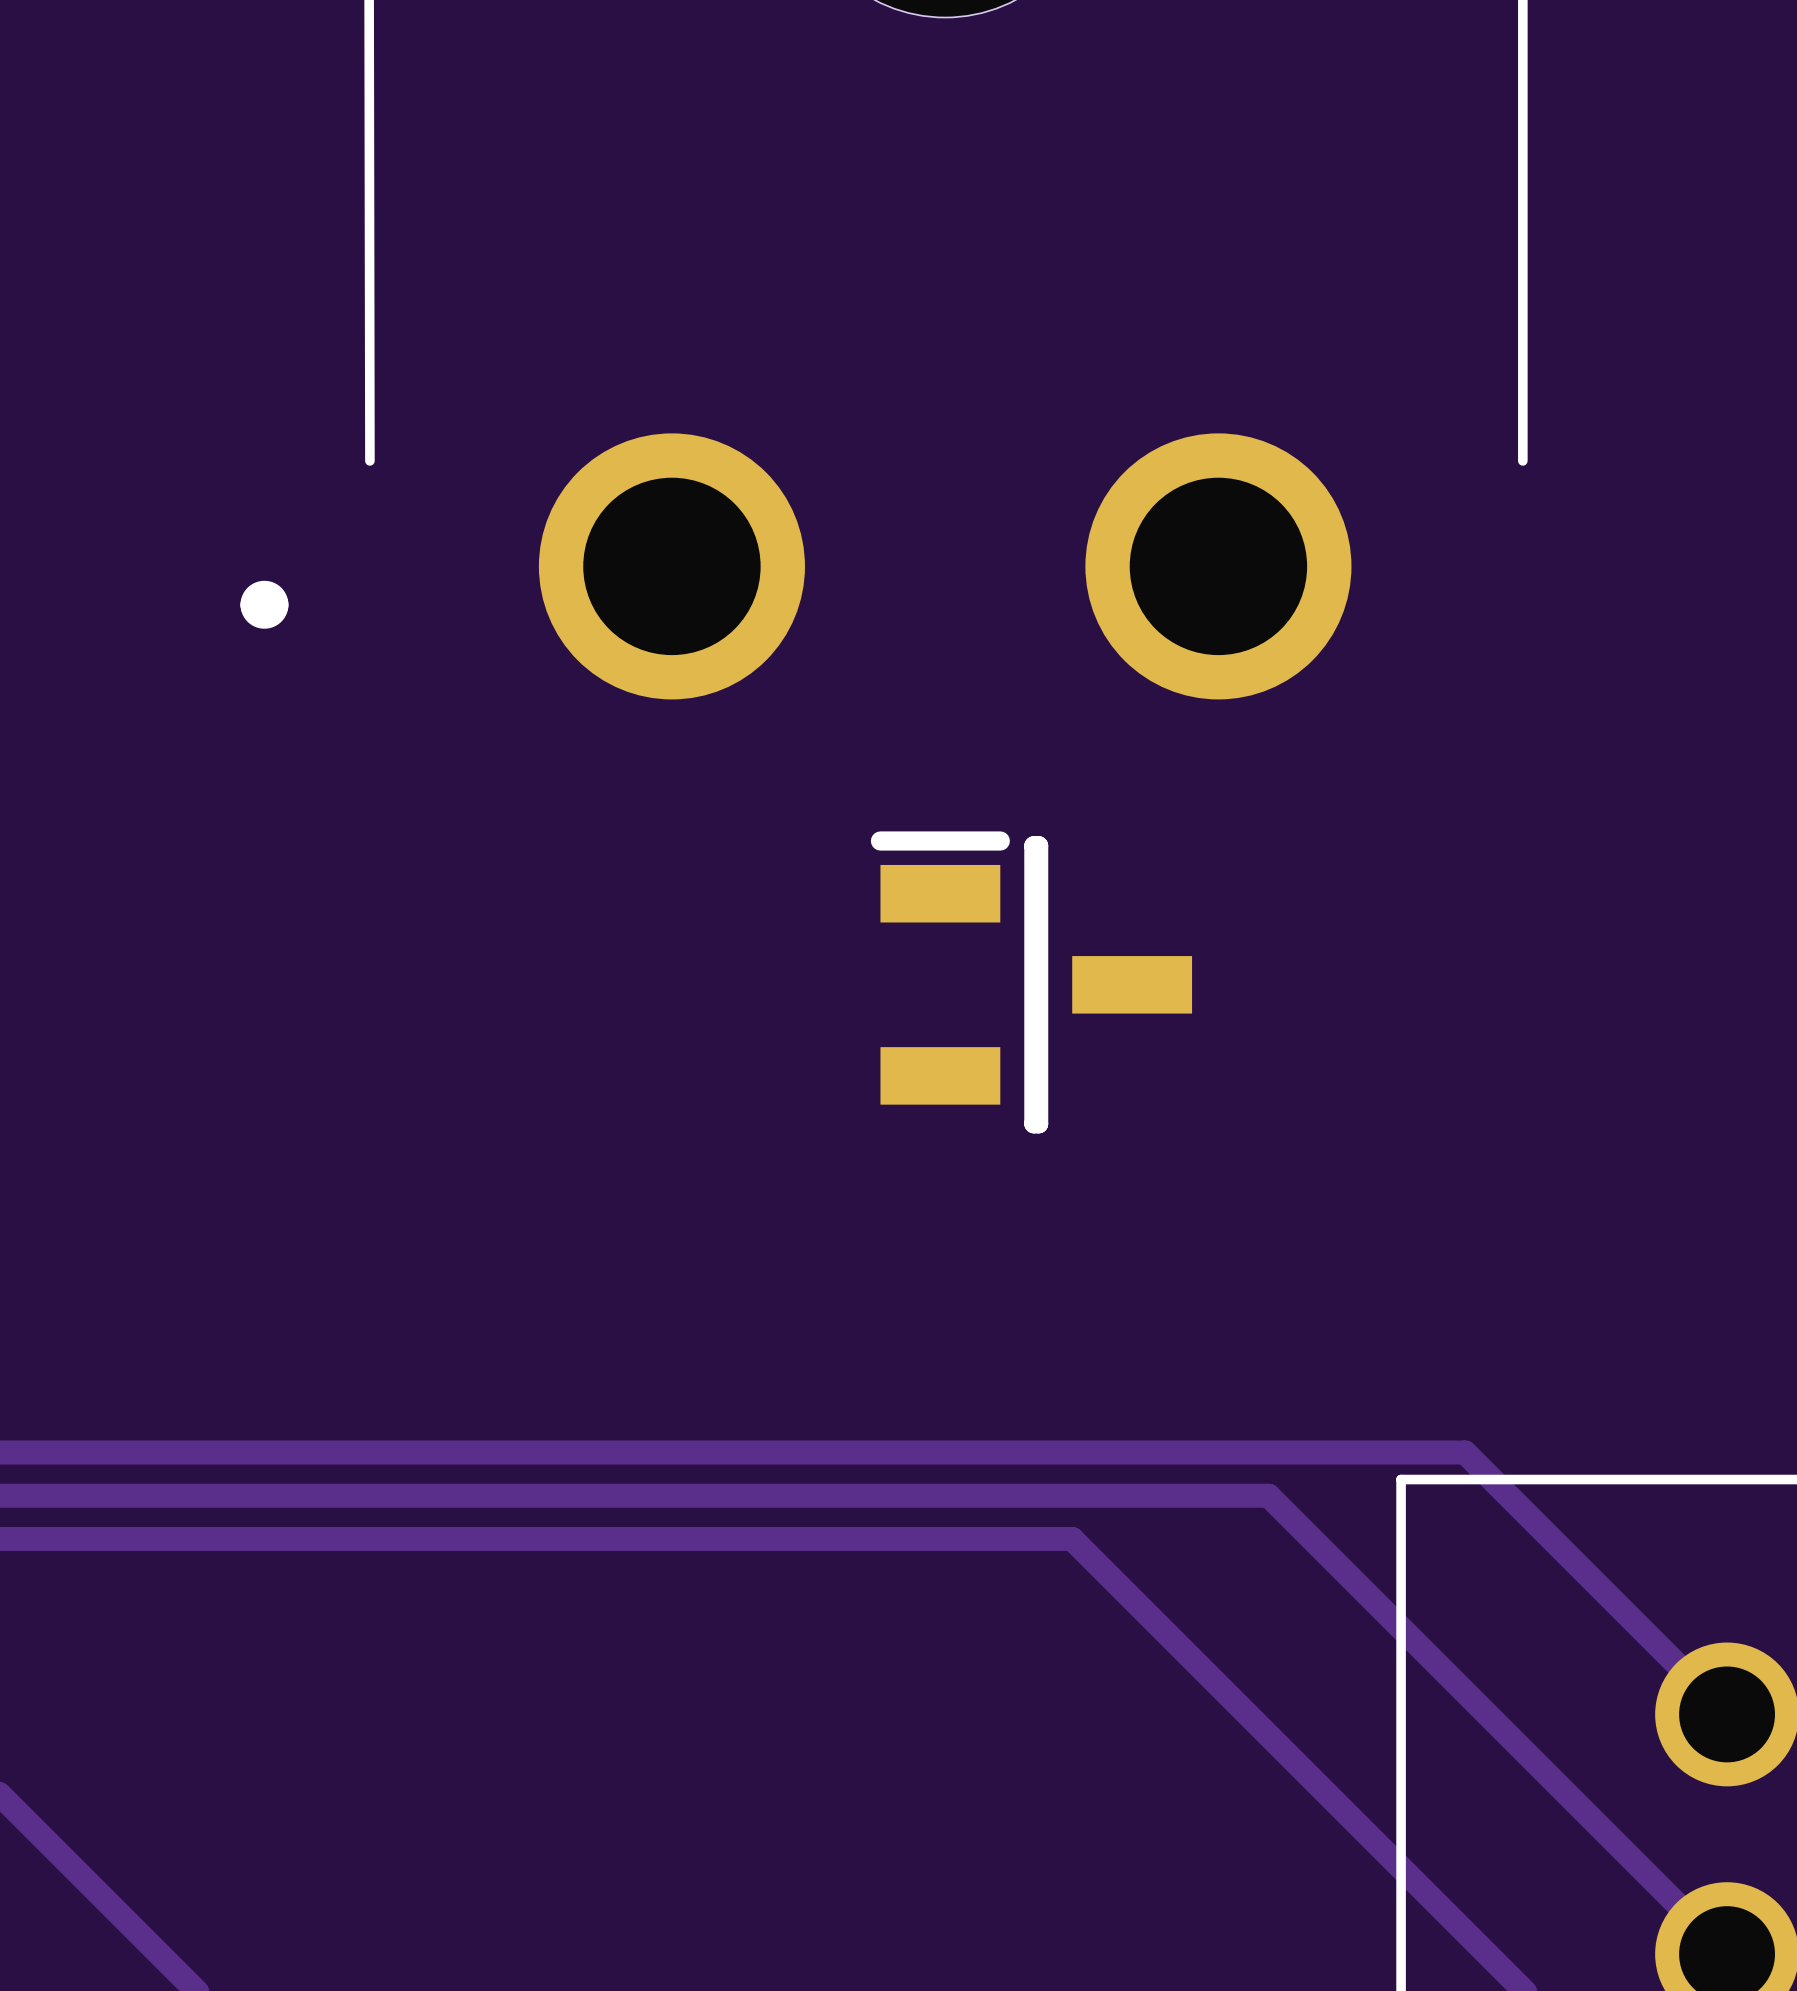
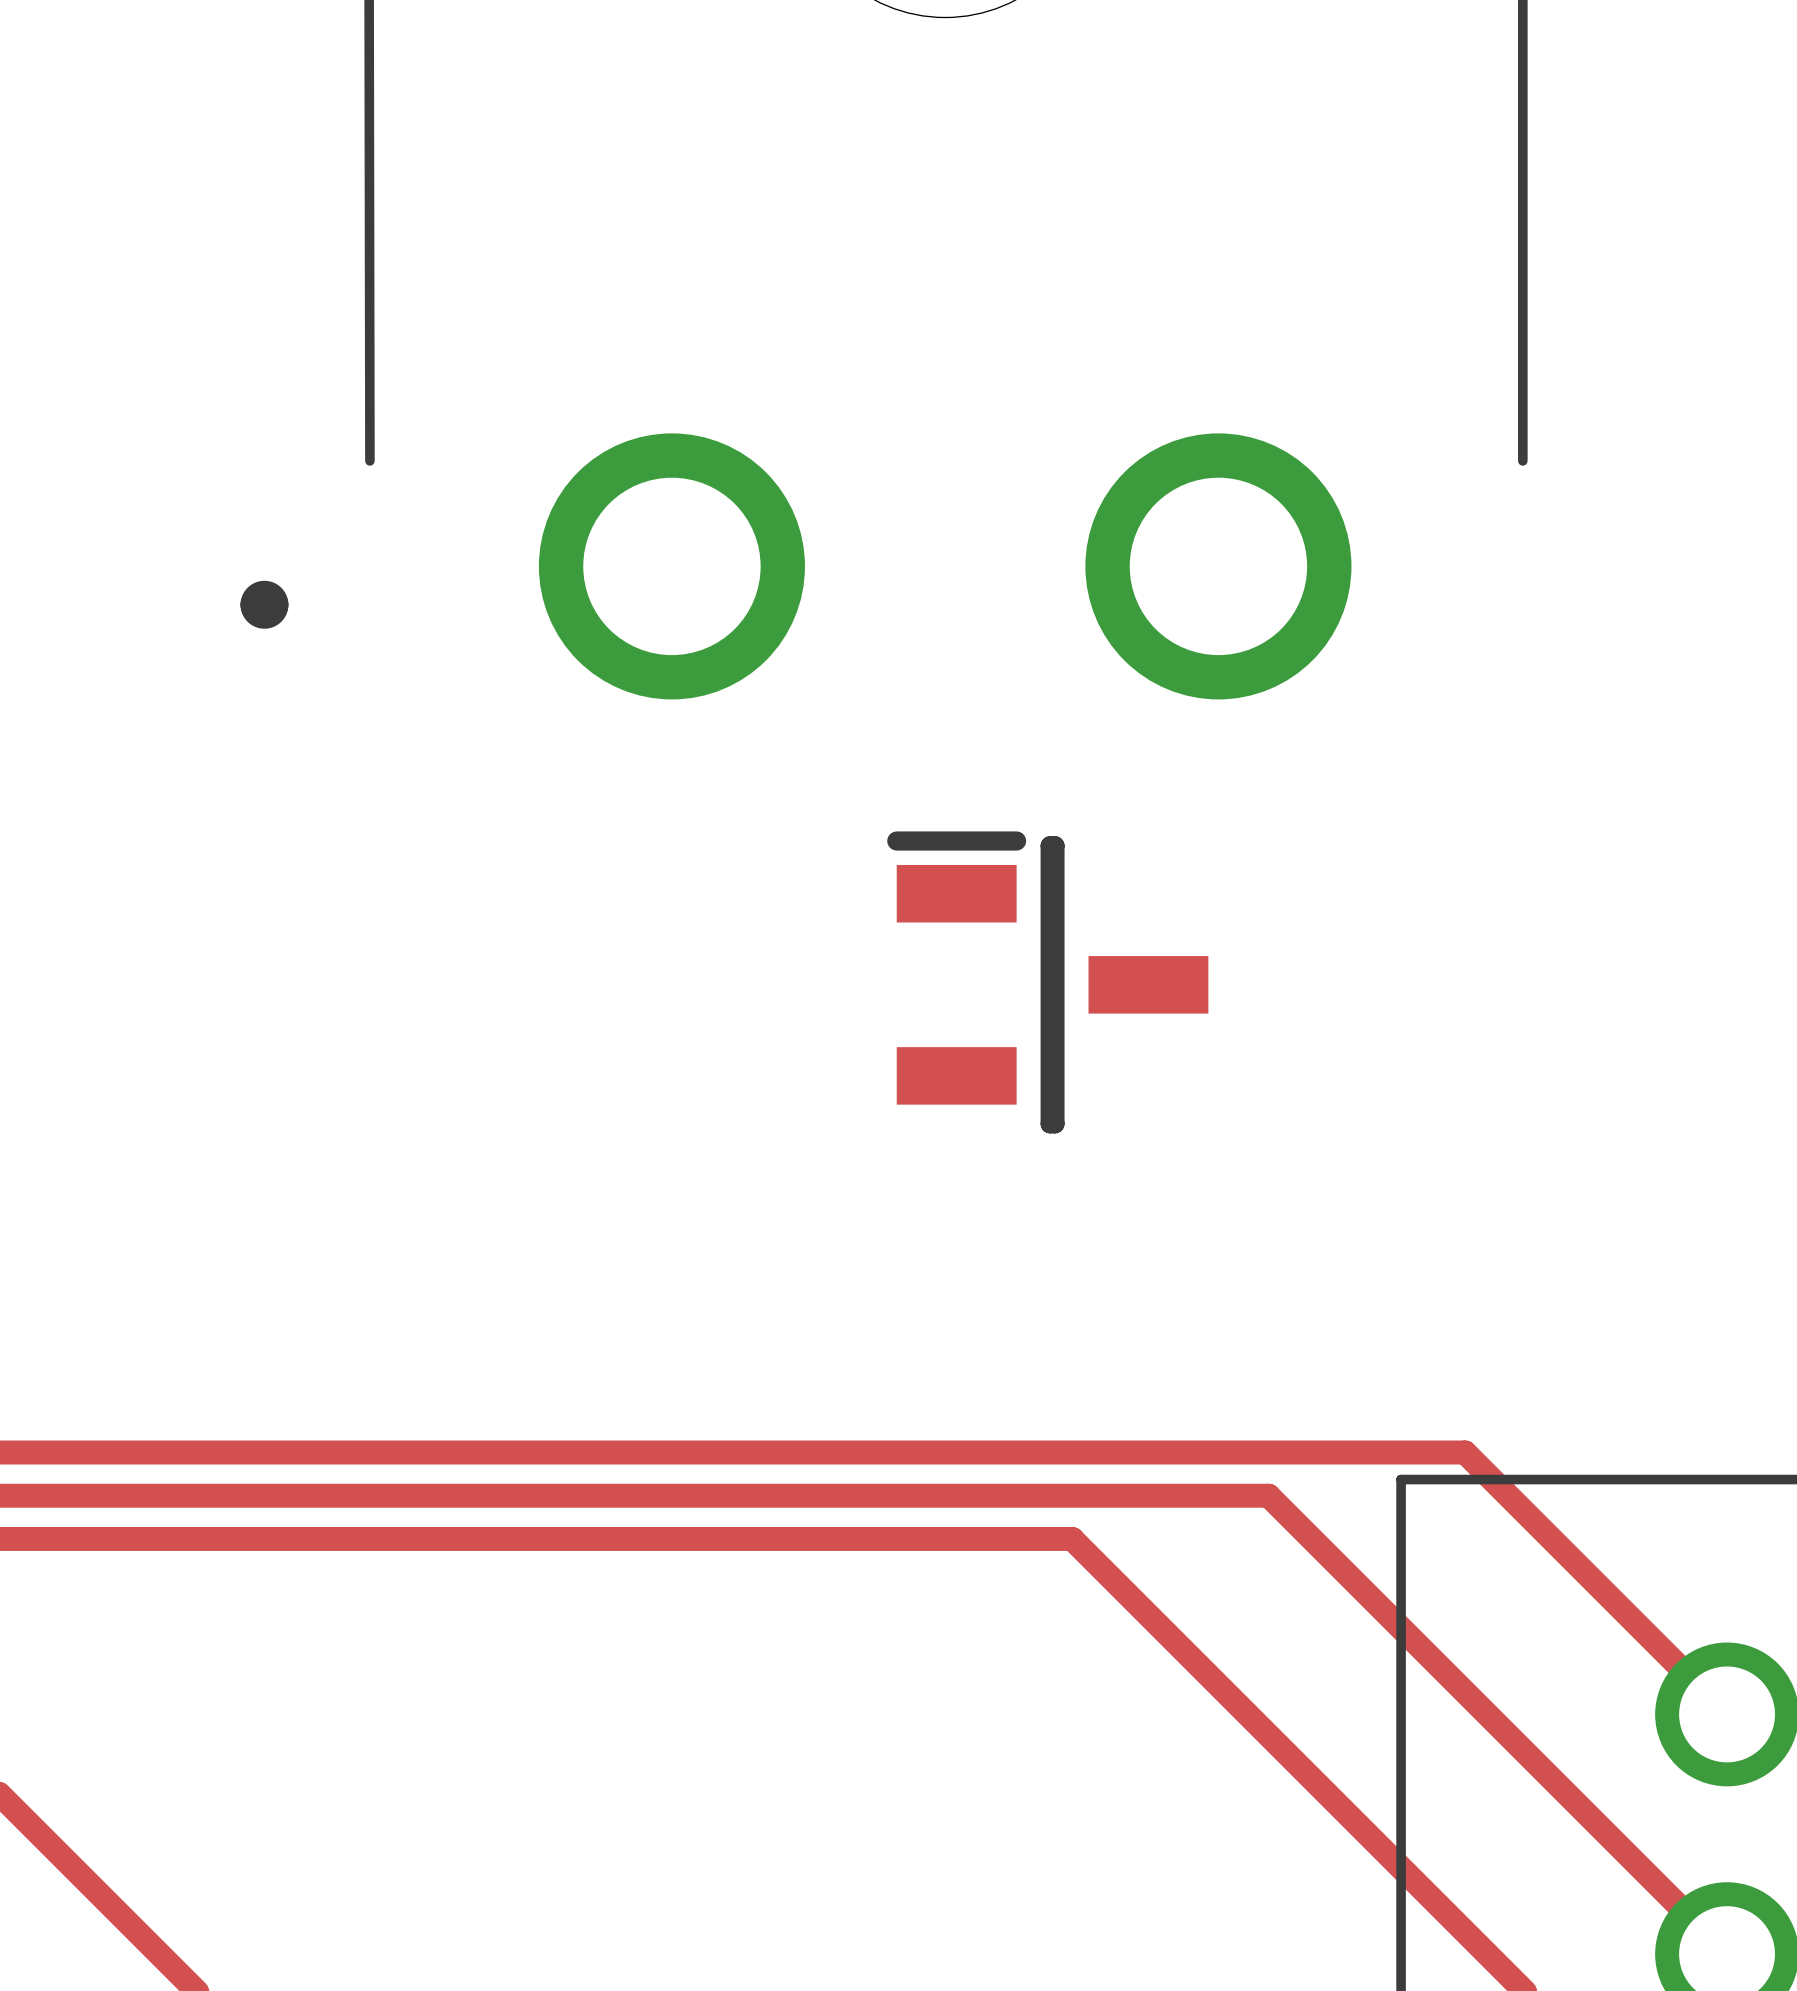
part position: (1031, 982) -> (1047, 982)

